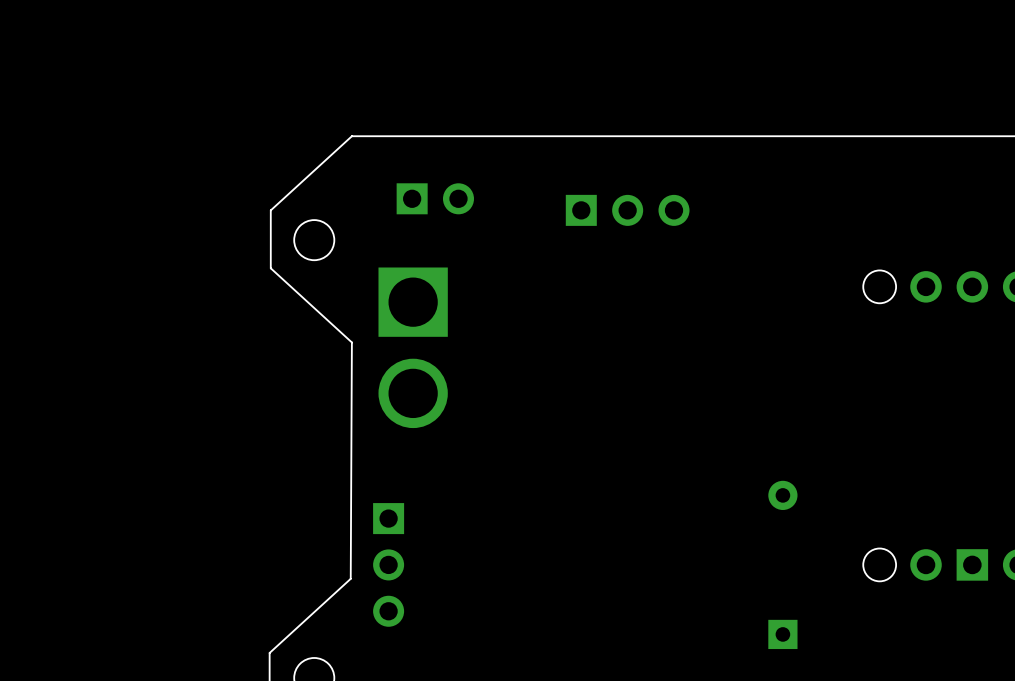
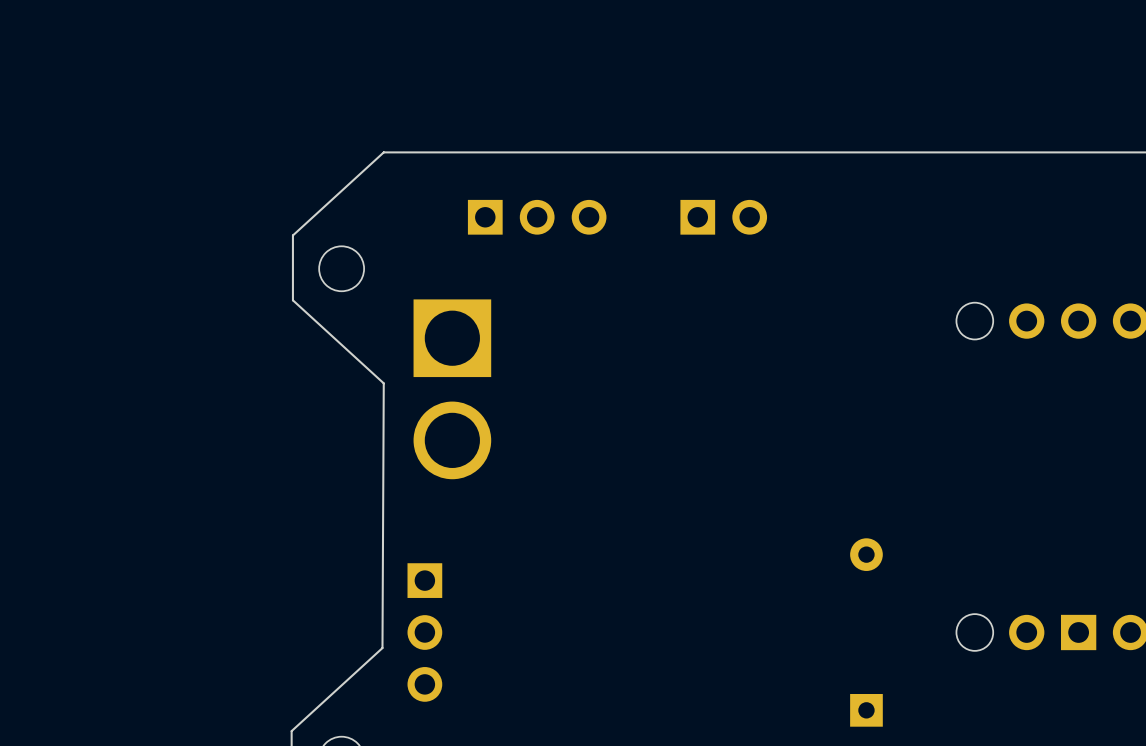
part position: (435, 198) -> (723, 217)
part position: (627, 210) -> (537, 217)

